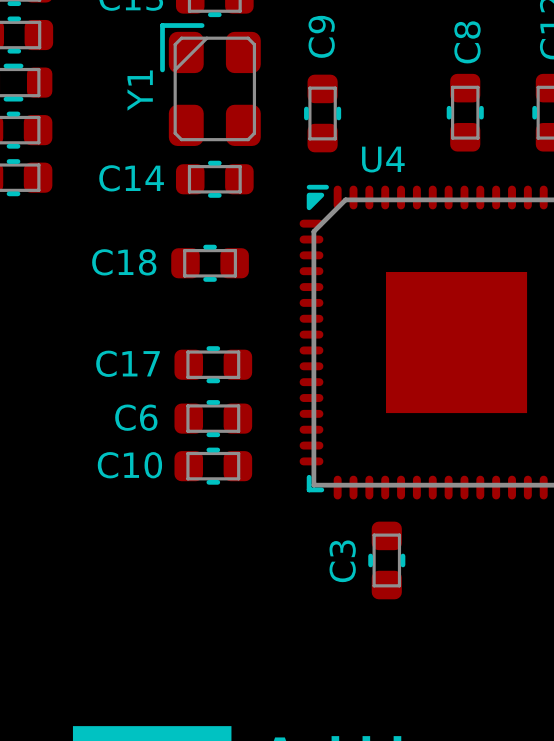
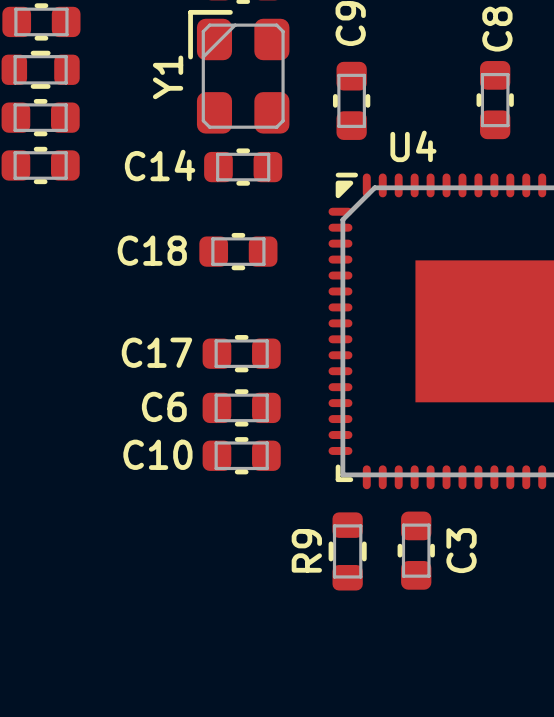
R9: none -> (347, 551)
C3 name position: C3 (342, 561) -> C3 (461, 550)

